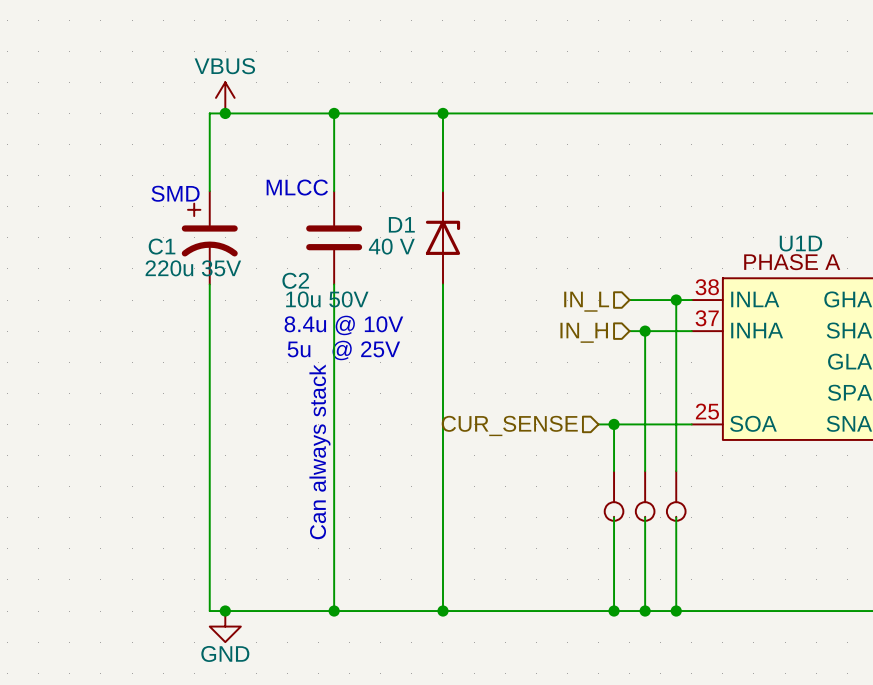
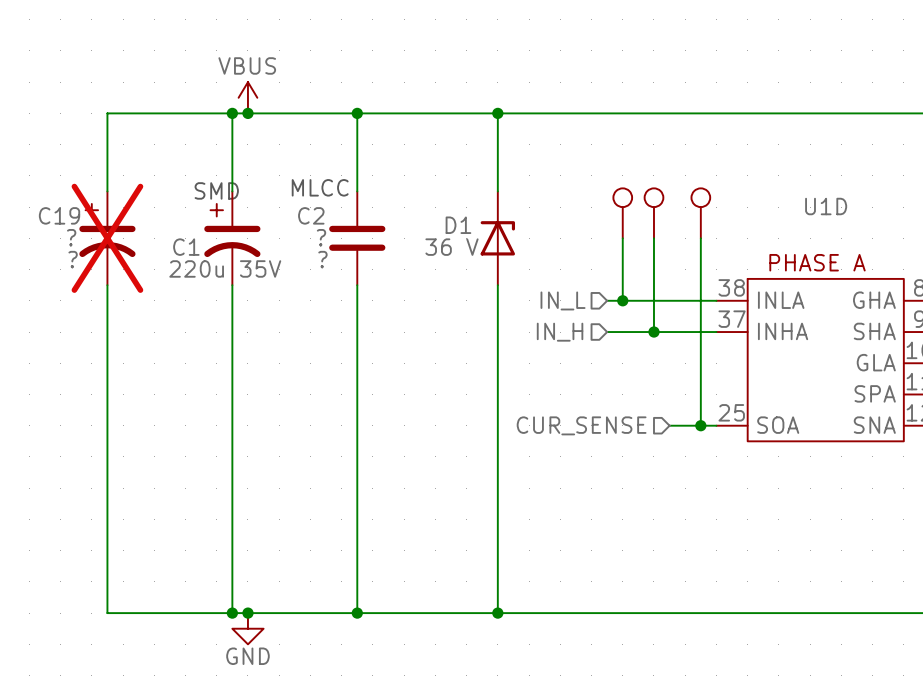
wire: none -> (232, 113) (107, 113) (107, 191)
junction: none -> (232, 113)
wire: (442, 113) (442, 191) -> (497, 113) (497, 191)
junction position: (442, 113) -> (497, 113)
text position: SMD (175, 193) -> SMD (216, 190)
part: none -> (622, 213)
part: none -> (653, 213)
part: none -> (700, 213)
C19: none -> ? (107, 238)
D1 position: (442, 237) -> (497, 238)
wire: none -> (622, 238) (622, 300)
wire: none -> (653, 238) (653, 332) (607, 332)
wire: none -> (700, 238) (700, 300)
U1D name position: U1D (800, 243) -> U1D (826, 206)
D1 value: 40 V (391, 246) -> 36 V (451, 247)
C2 text: none -> ? (322, 259)
C2 name position: C2 (295, 280) -> C2 (311, 215)
wire: none -> (107, 285) (107, 613) (232, 613)
wire: (442, 284) (442, 611) -> (497, 285) (497, 613)
C2 value: 10u 50V (327, 299) -> ? (321, 237)
junction: none -> (622, 300)
junction: (676, 300) -> none
hierarchical label position: IN_L (586, 301) -> IN_L (563, 300)
text: 8.4u @ 10V (343, 325) -> none
wire: (645, 331) (645, 471) -> none
junction position: (645, 331) -> (653, 332)
hierarchical label position: IN_H (584, 332) -> IN_H (560, 332)
text: 5u @ 25V (343, 350) -> none
wire: (598, 424) (645, 424) -> (607, 300) (653, 300)
wire: (614, 424) (614, 471) -> none
junction: (614, 424) -> none
wire: (676, 424) (676, 471) -> none
junction: none -> (700, 425)
hierarchical label position: CUR_SENSE (509, 425) -> CUR_SENSE (581, 425)
text: Can always stack (319, 451) -> none
part: (614, 495) -> none
part: (645, 495) -> none
part: (676, 495) -> none
wire: (614, 517) (614, 611) -> none
wire: (645, 517) (645, 611) -> none
wire: (676, 517) (676, 611) -> none
junction: none -> (232, 613)
junction position: (442, 611) -> (497, 613)
junction: (614, 611) -> none
junction: (645, 611) -> none
junction: (676, 611) -> none

